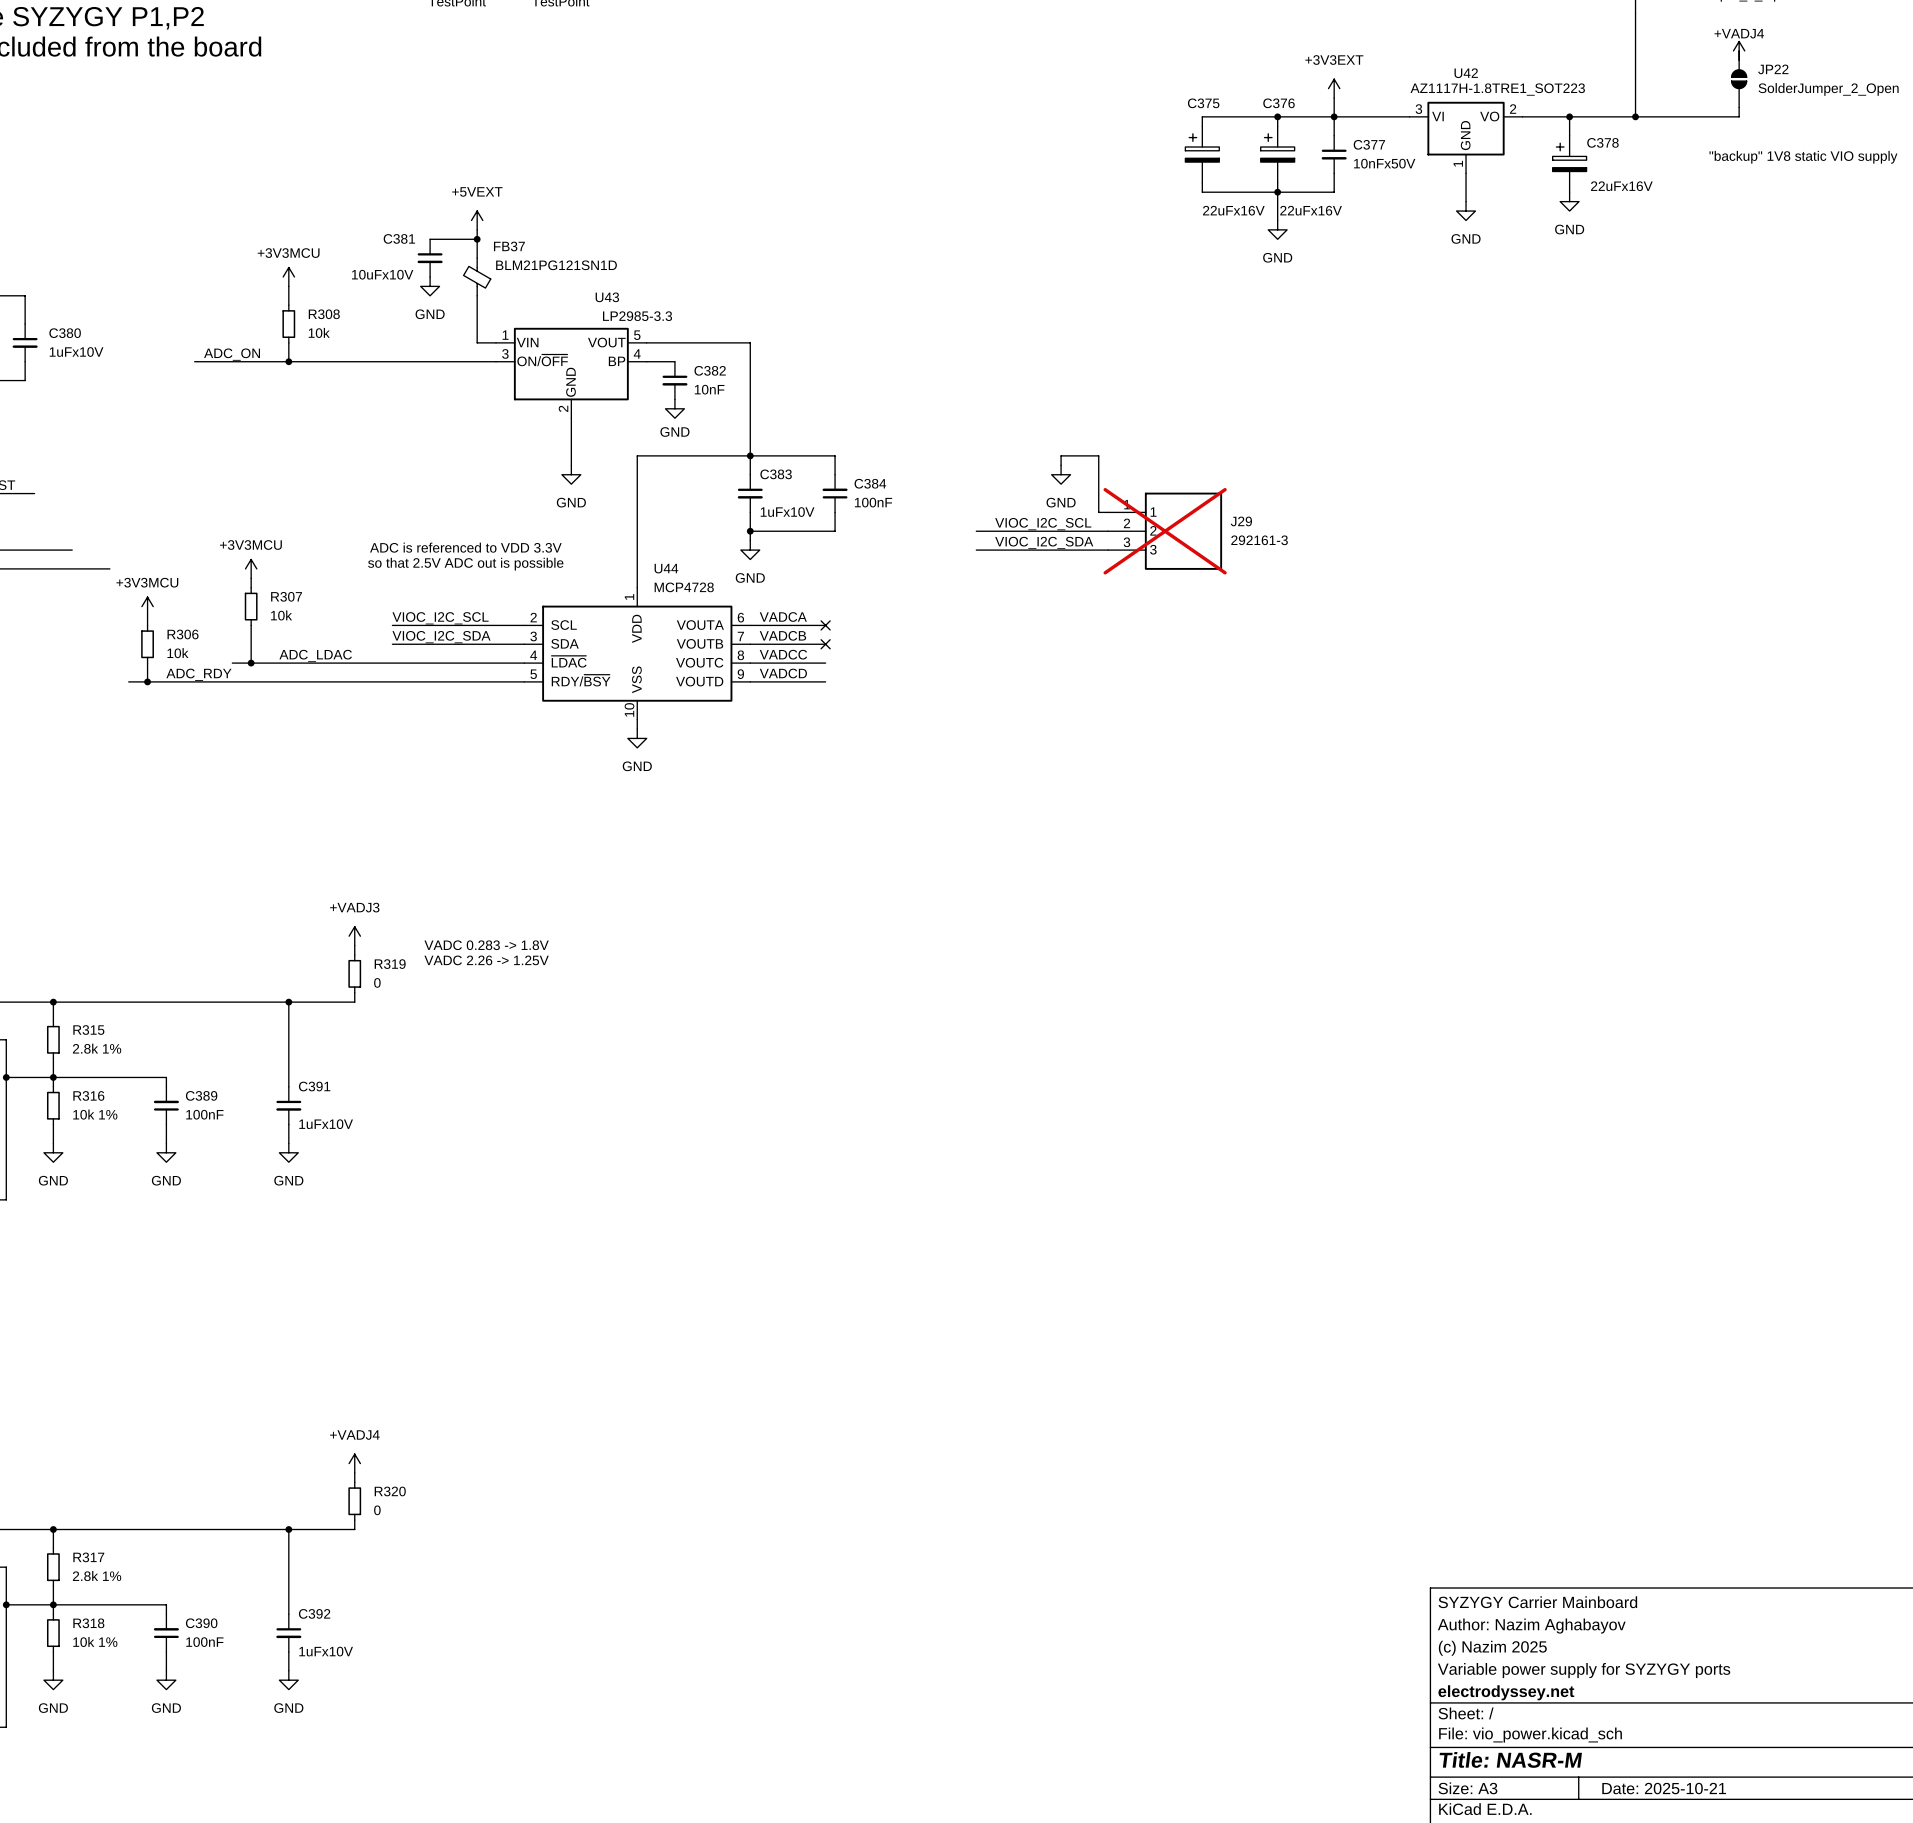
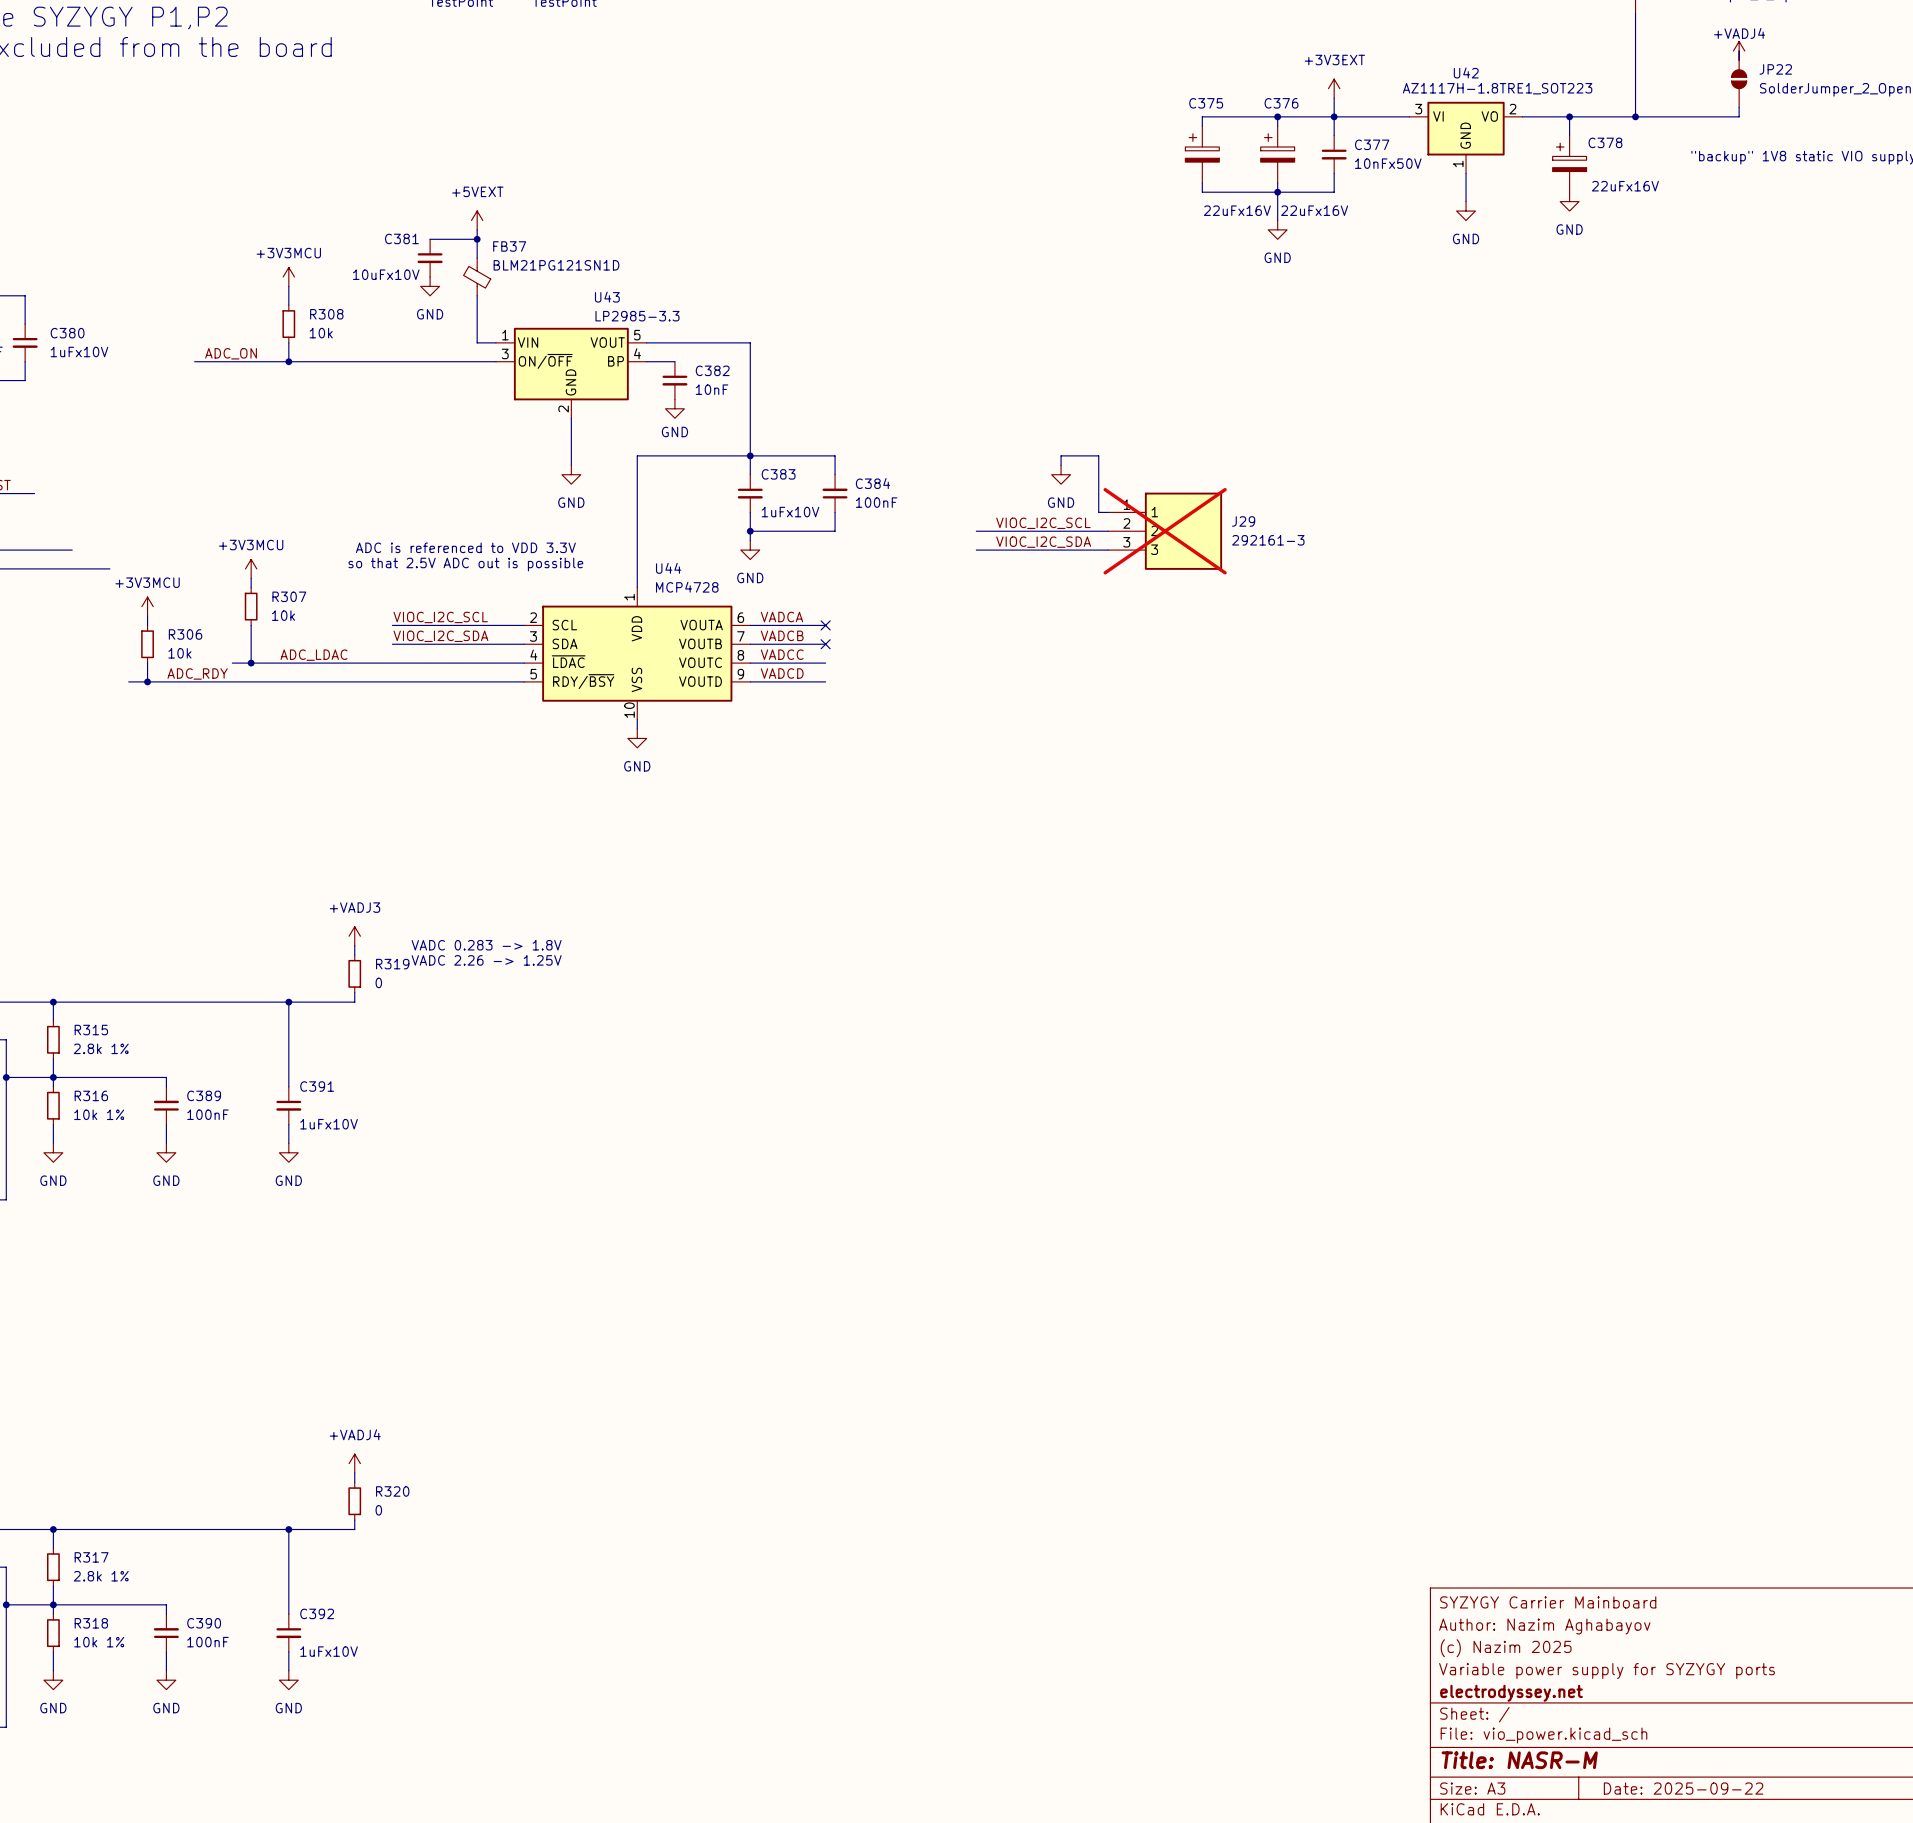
title block: Date: 2025-10-21 (1664, 1788) -> Date: 2025-09-22 (1683, 1788)

